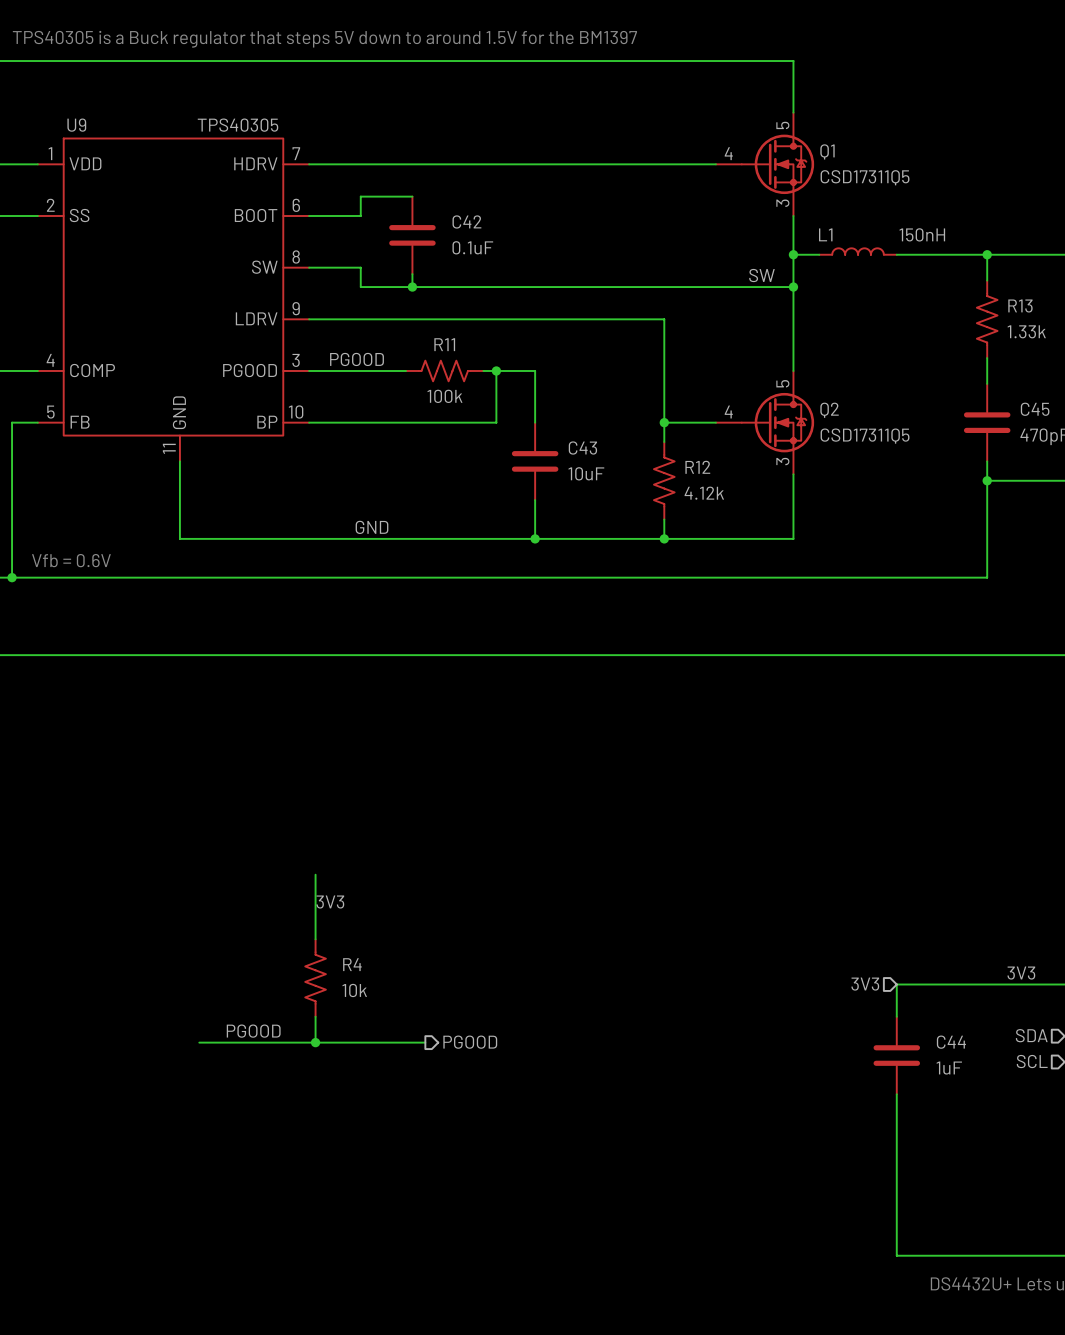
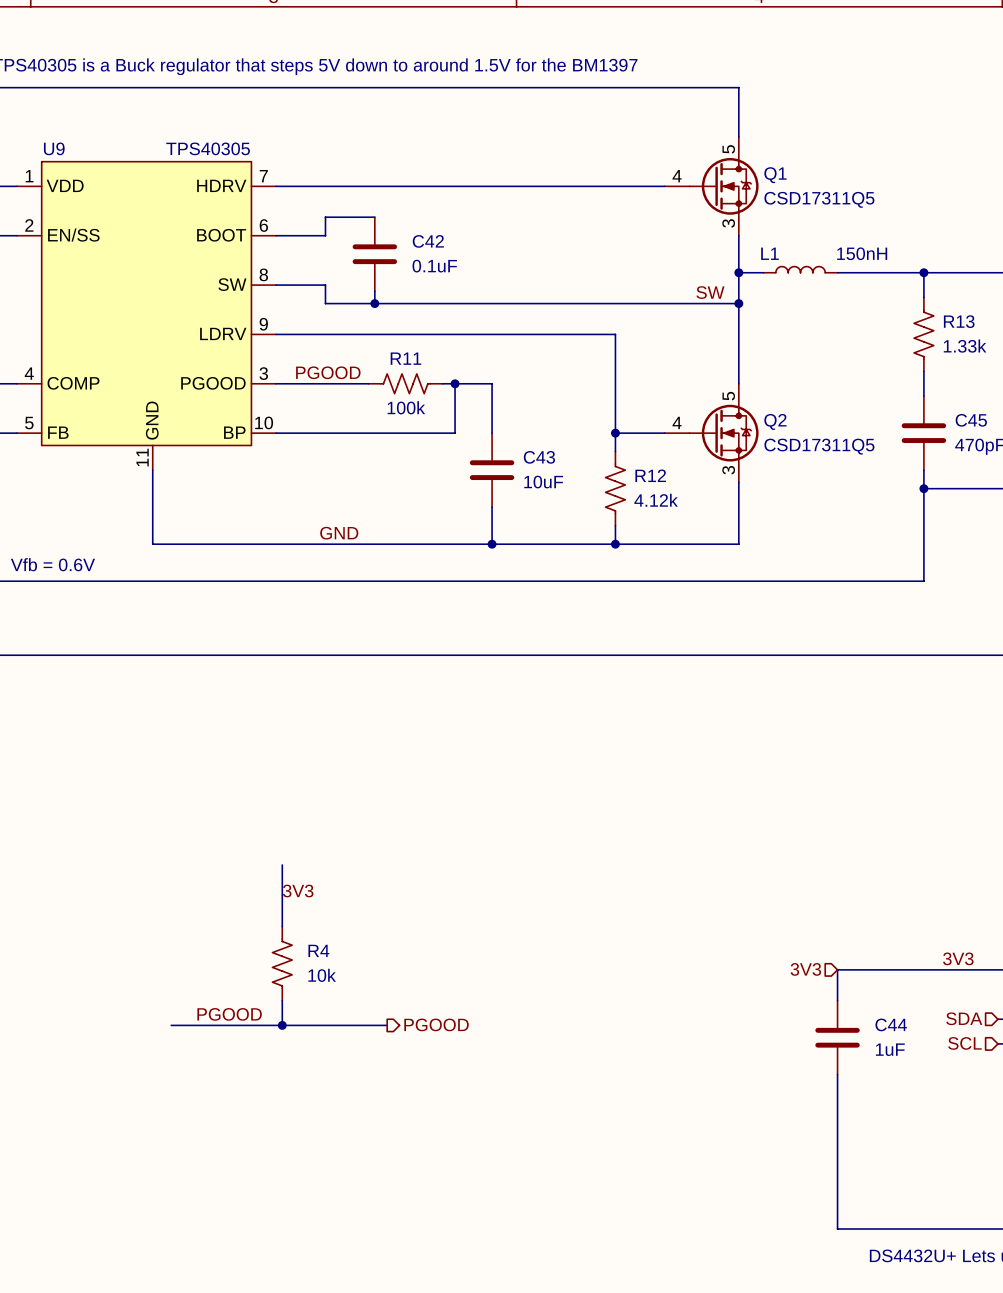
U9 pin name: SS (79, 215) -> EN/SS (73, 235)

